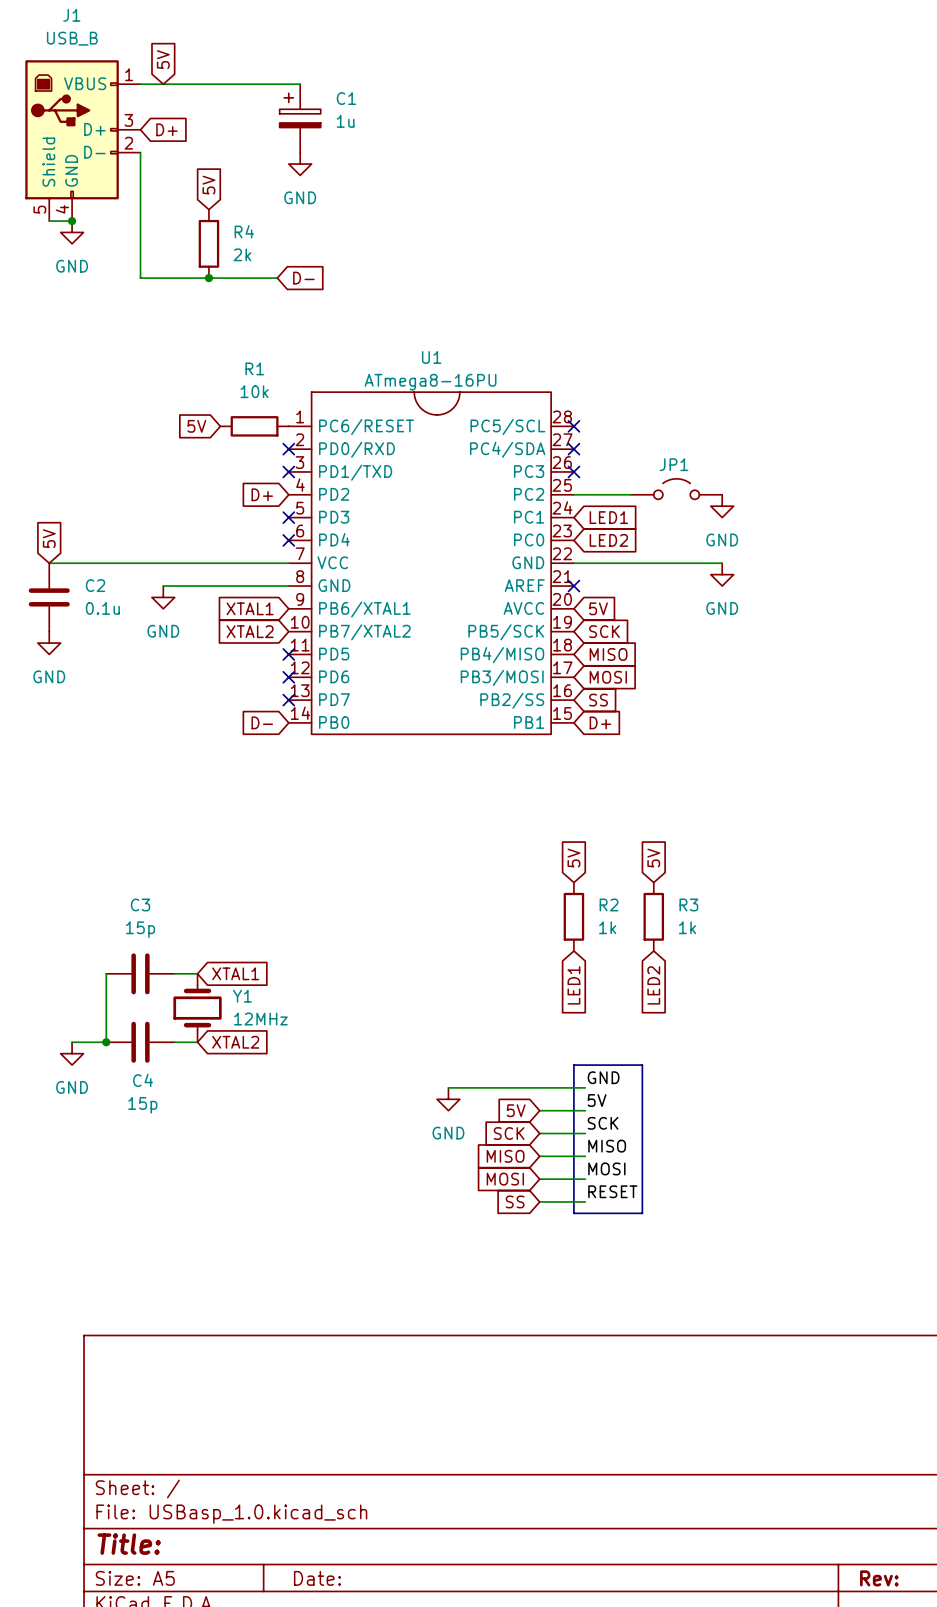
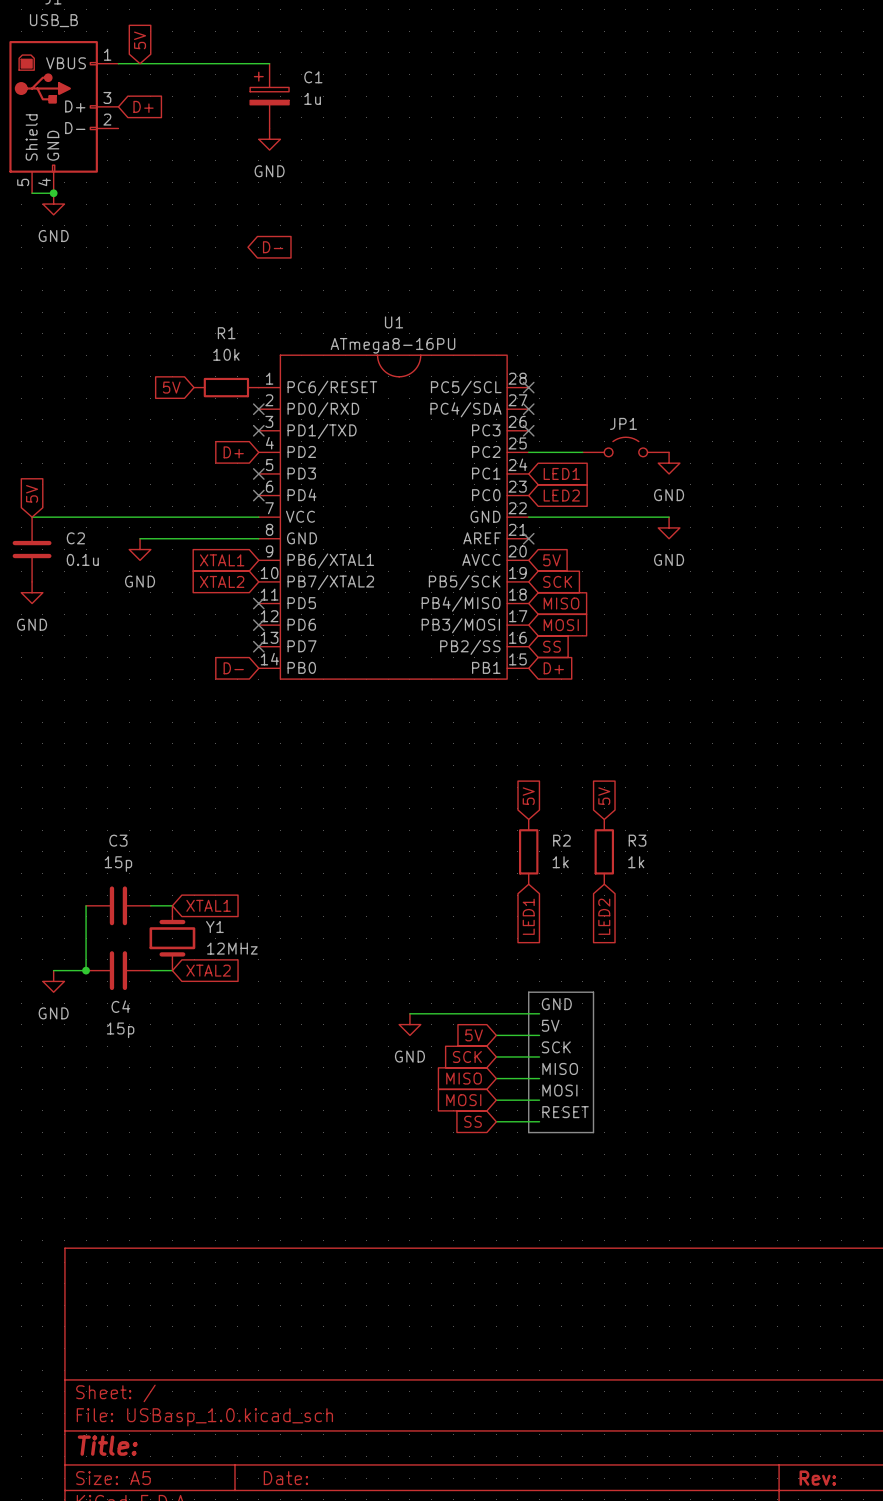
wire: (140, 152) (140, 278) (277, 278) -> none
global label: 5V (208, 185) -> none
R4: 2k (208, 243) -> none
junction: (208, 278) -> none

